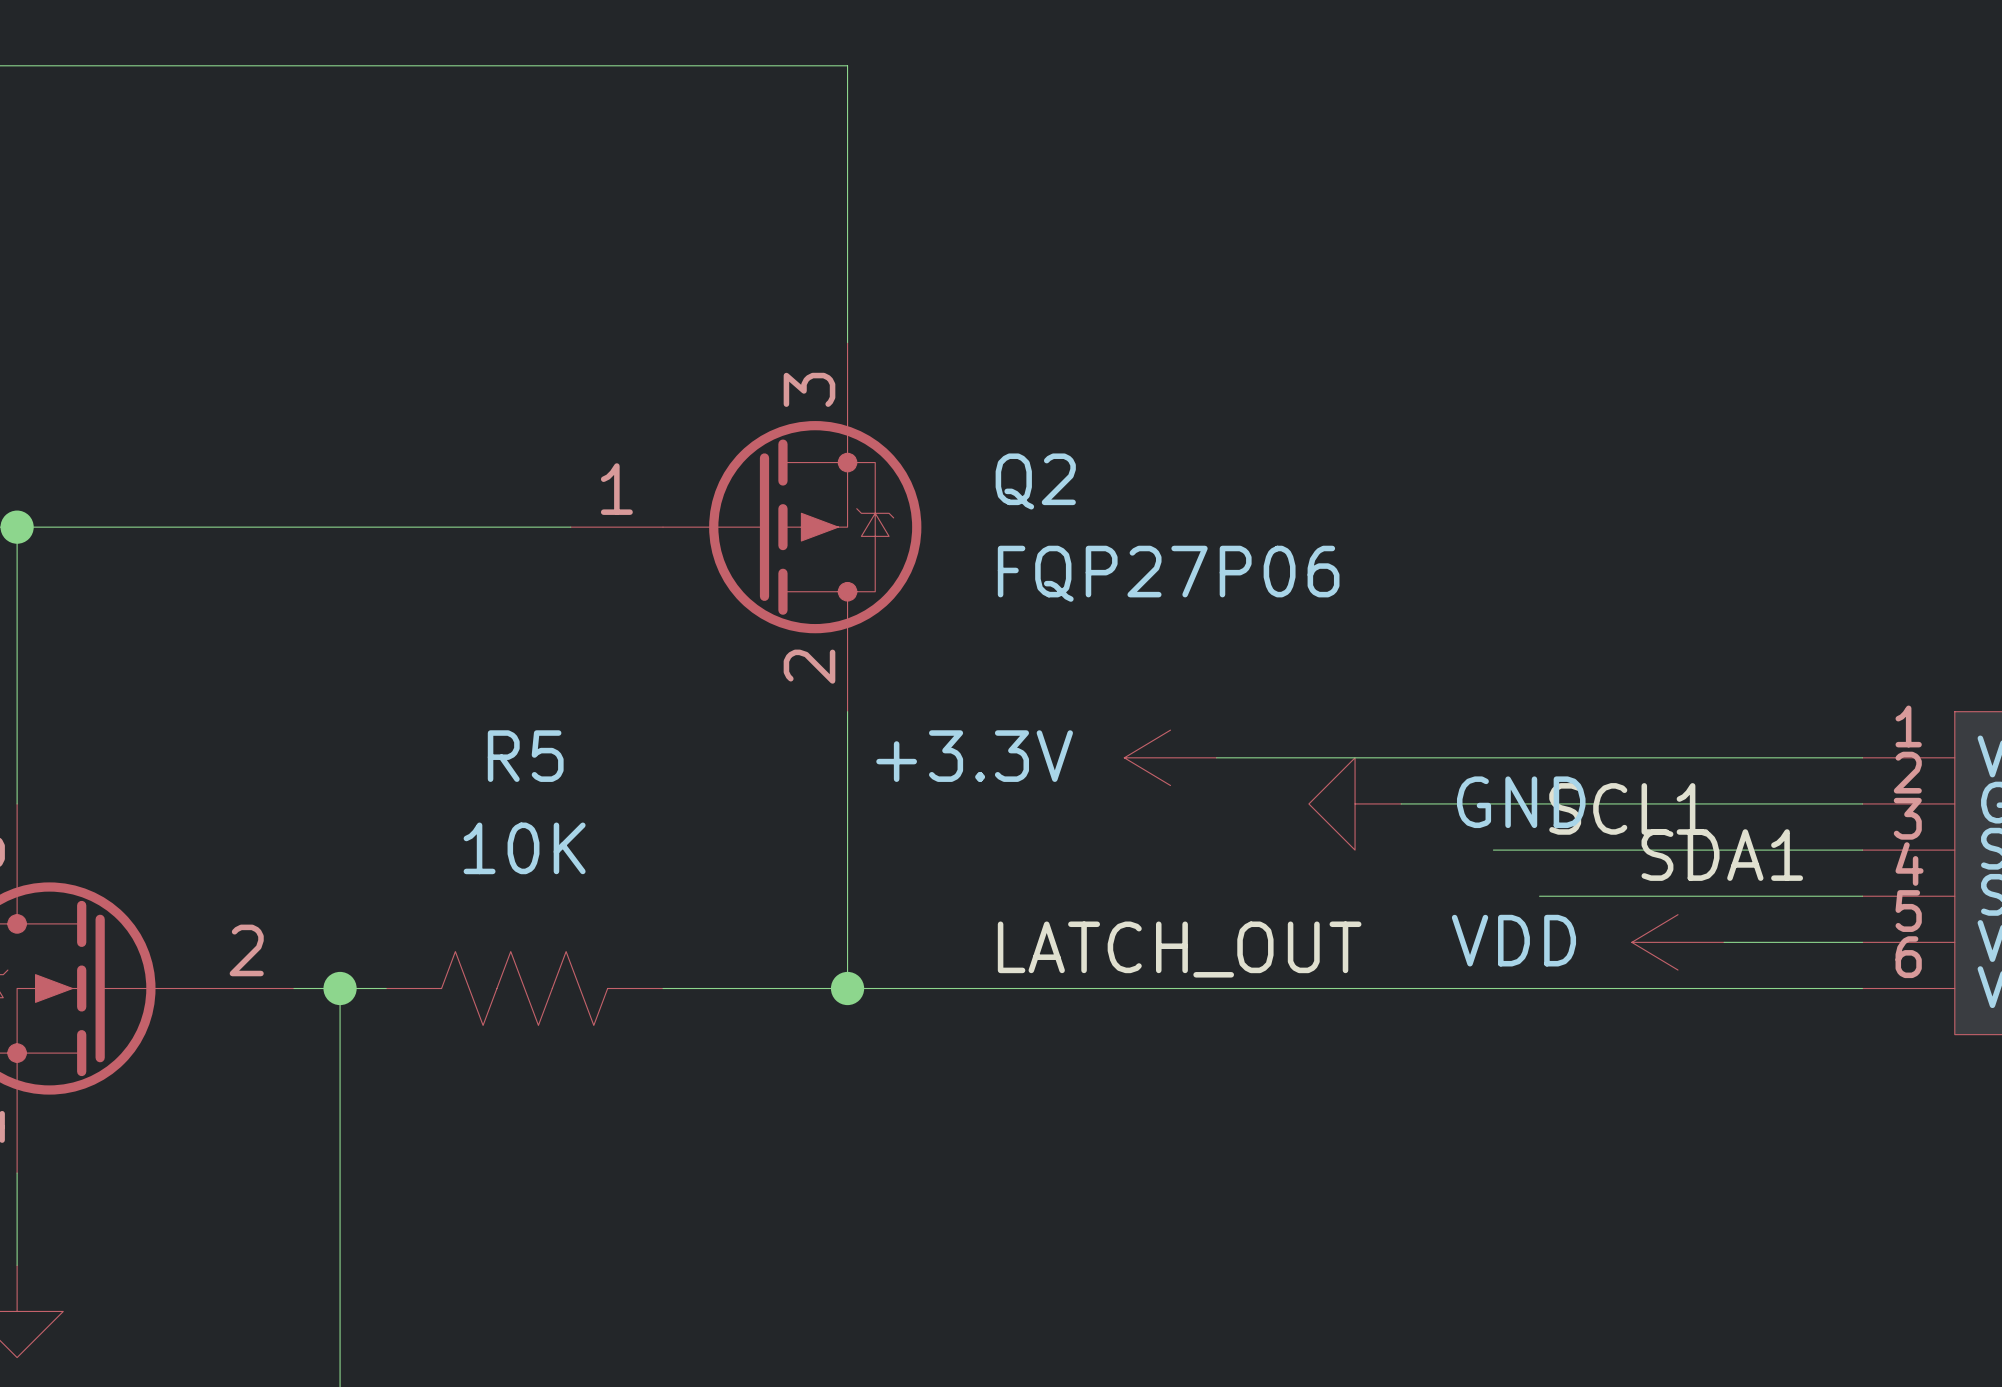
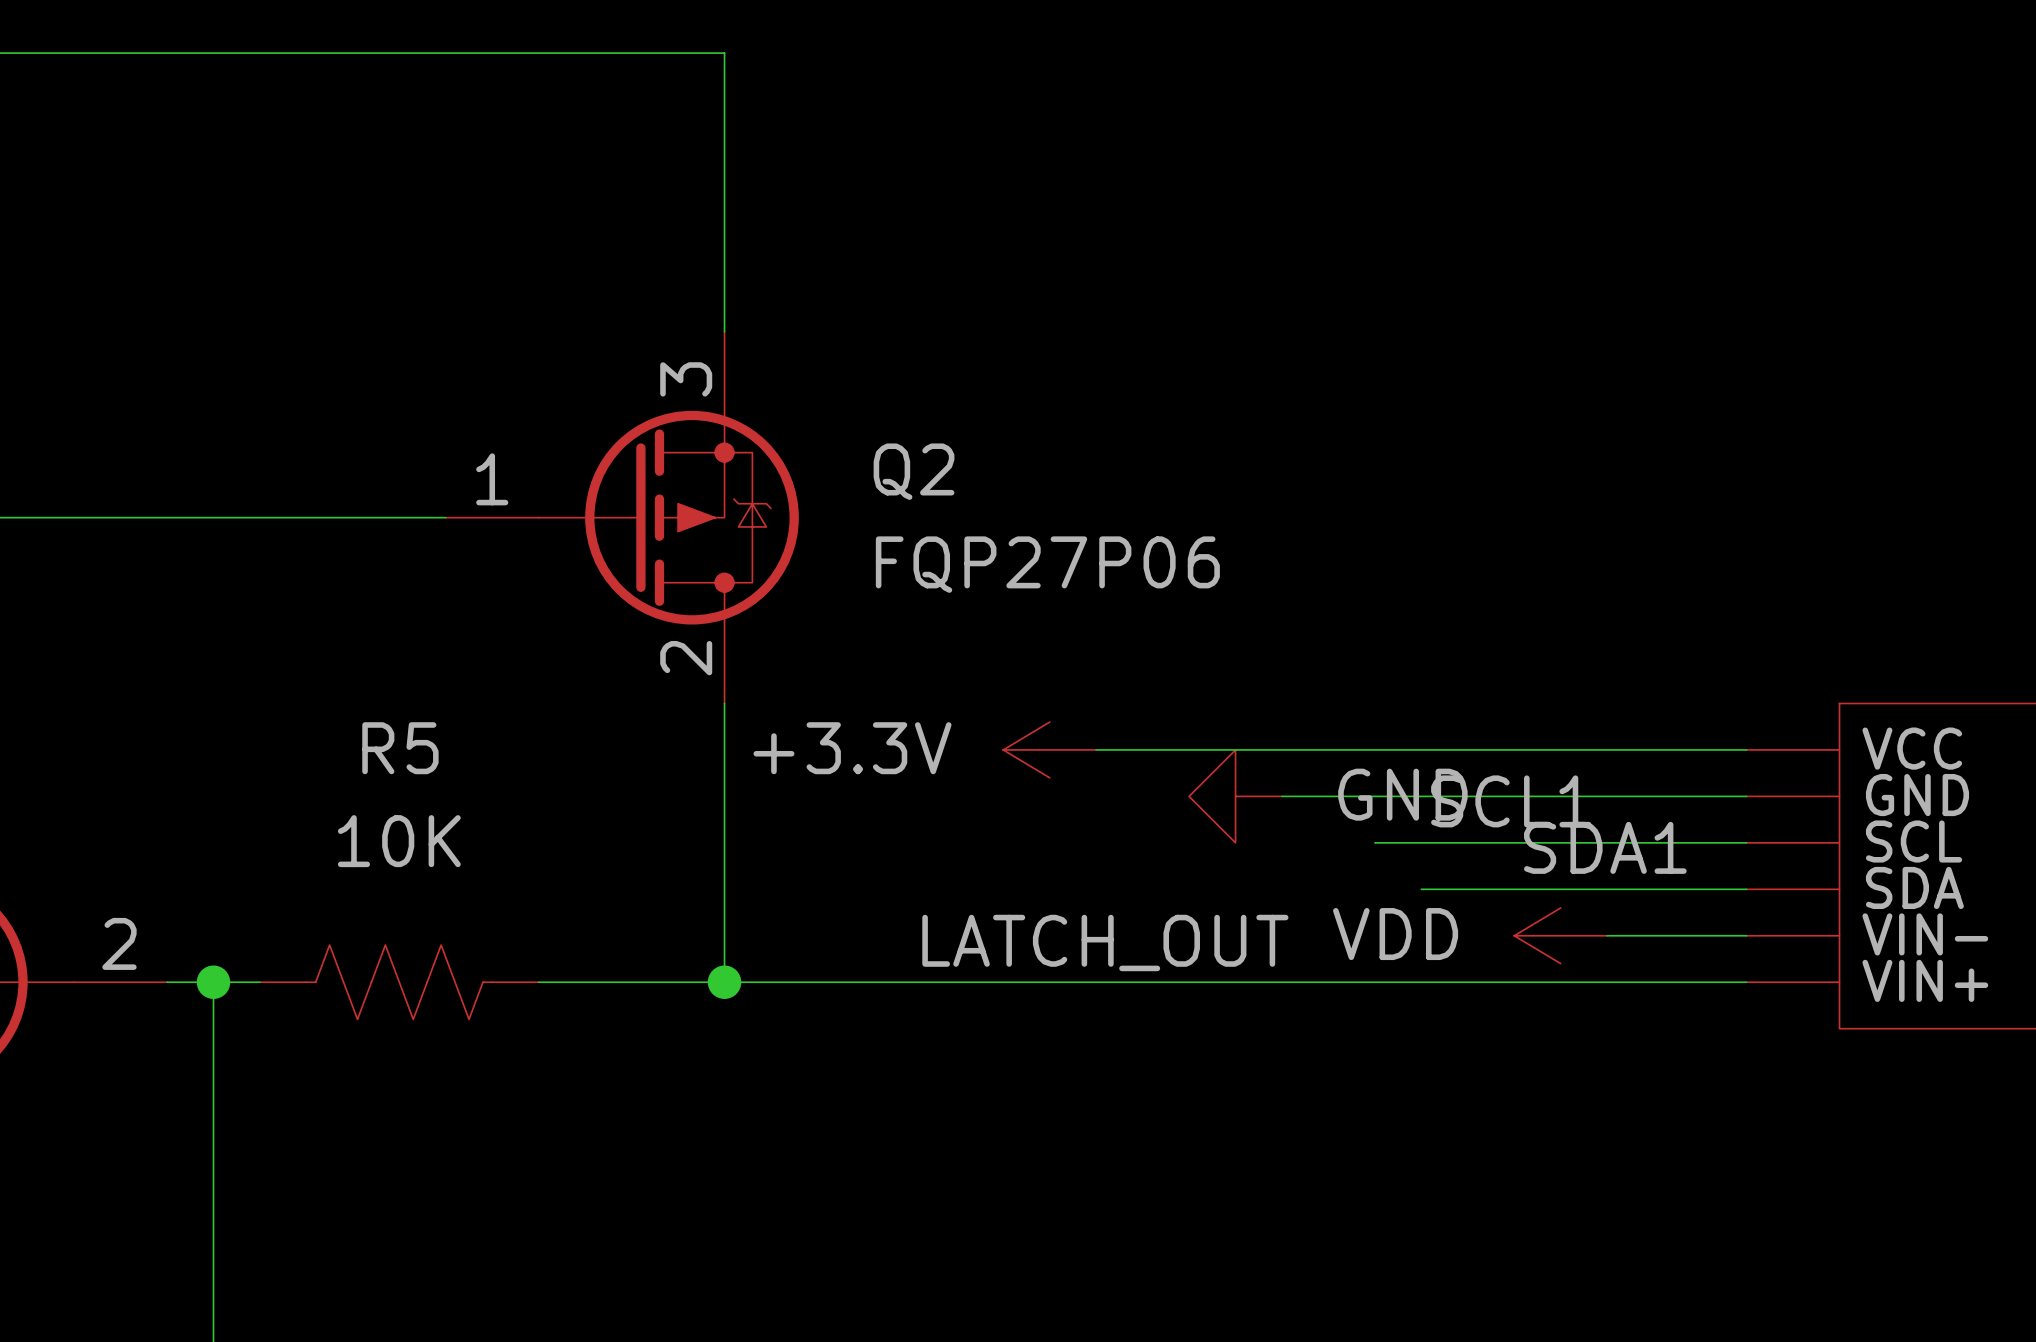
part pin number: 1 (1908, 726) -> none
part pin number: 2 (1907, 772) -> none
part pin number: 3 (1907, 818) -> none
part pin number: 4 (1909, 864) -> none
part pin number: 5 (1908, 911) -> none
label position: LATCH_OUT (1179, 949) -> LATCH_OUT (1105, 942)
part pin number: 6 (1908, 957) -> none

